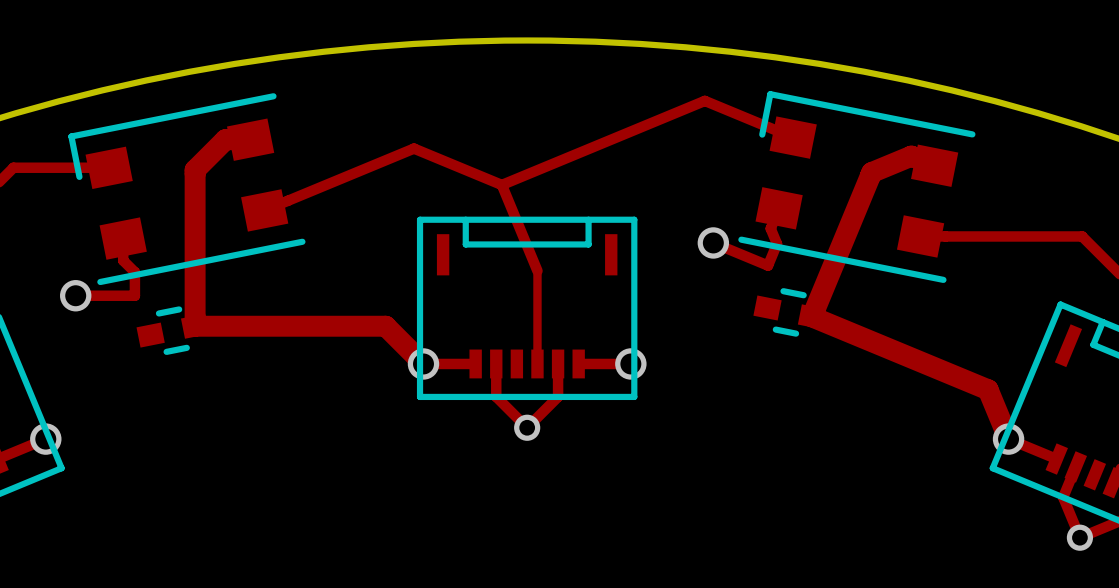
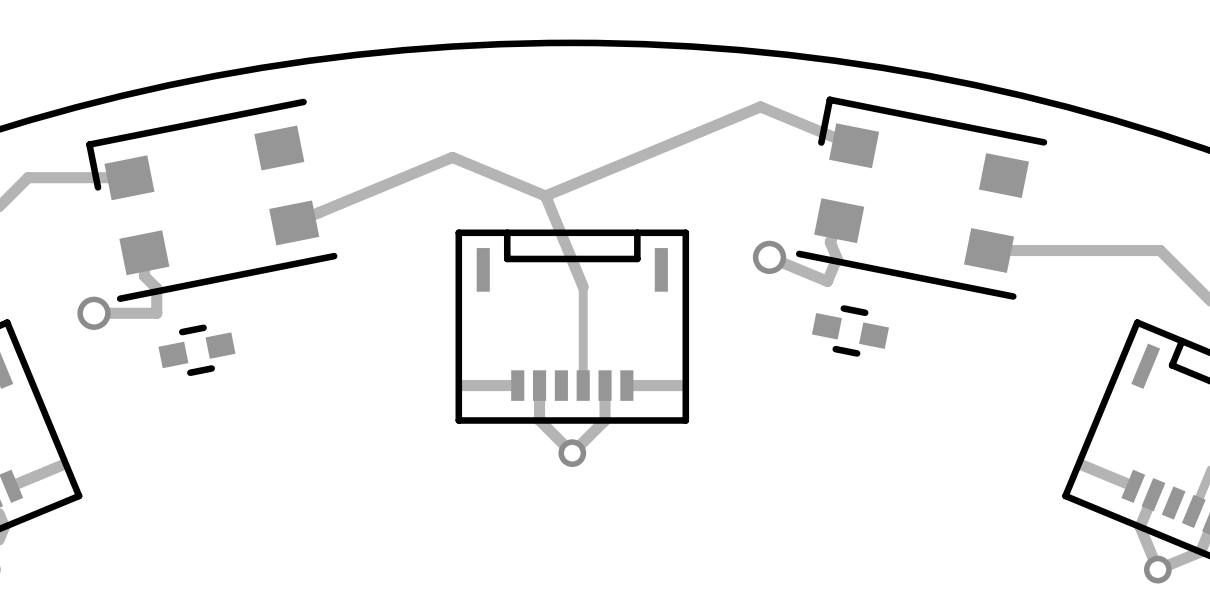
track: (250, 139) (225, 139) (195, 170) (195, 326) (385, 326) (423, 363) -> none
track: (934, 165) (911, 156) (871, 172) (811, 316) (988, 389) (1008, 439) -> none
via: (423, 363) -> none
via: (630, 363) -> none
via: (45, 439) -> none
via: (1008, 439) -> none

